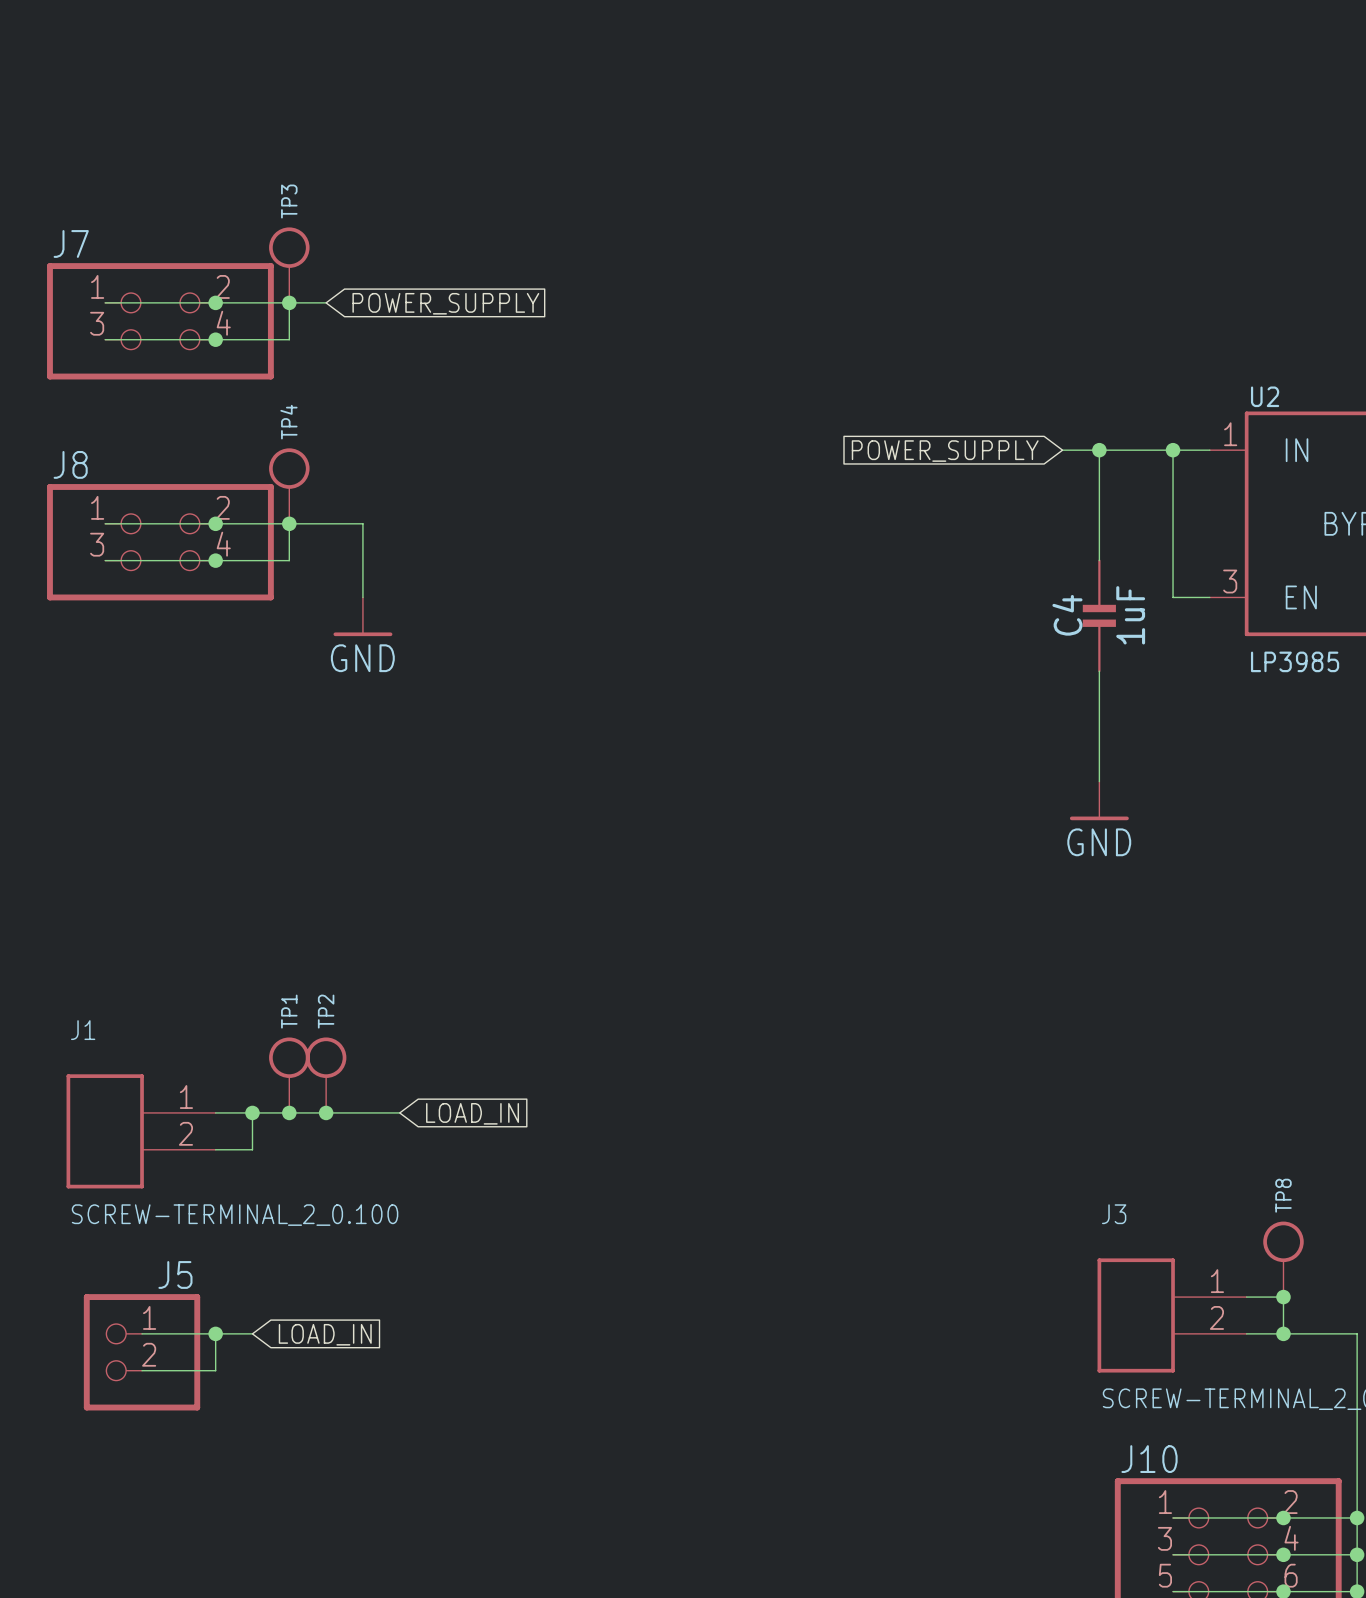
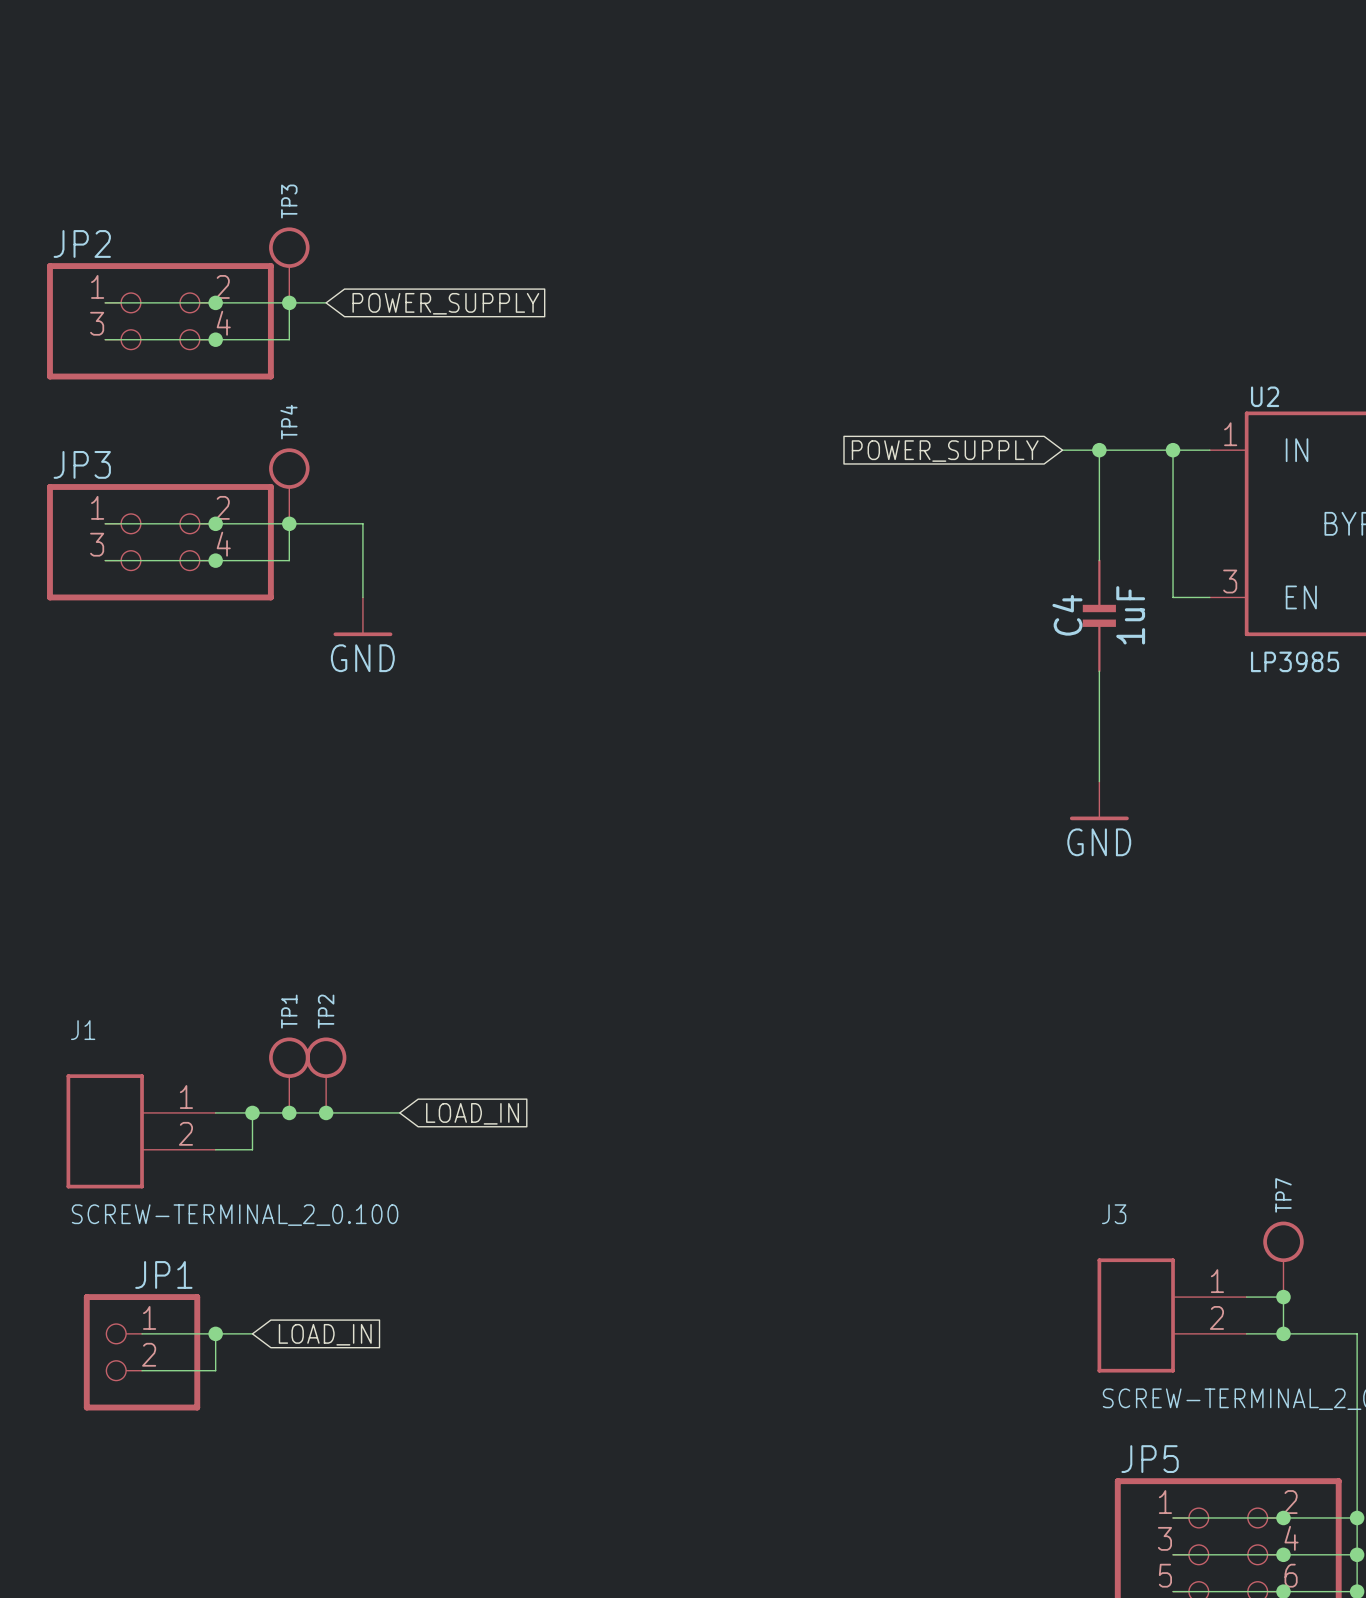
J7 name: J7 (71, 243) -> JP2 (82, 243)
J8 name: J8 (70, 464) -> JP3 (82, 464)
TP8 name: TP8 (1283, 1195) -> TP7 (1283, 1195)
J5 name: J5 (175, 1274) -> JP1 (163, 1274)
J10 name: J10 (1149, 1459) -> JP5 (1150, 1459)

